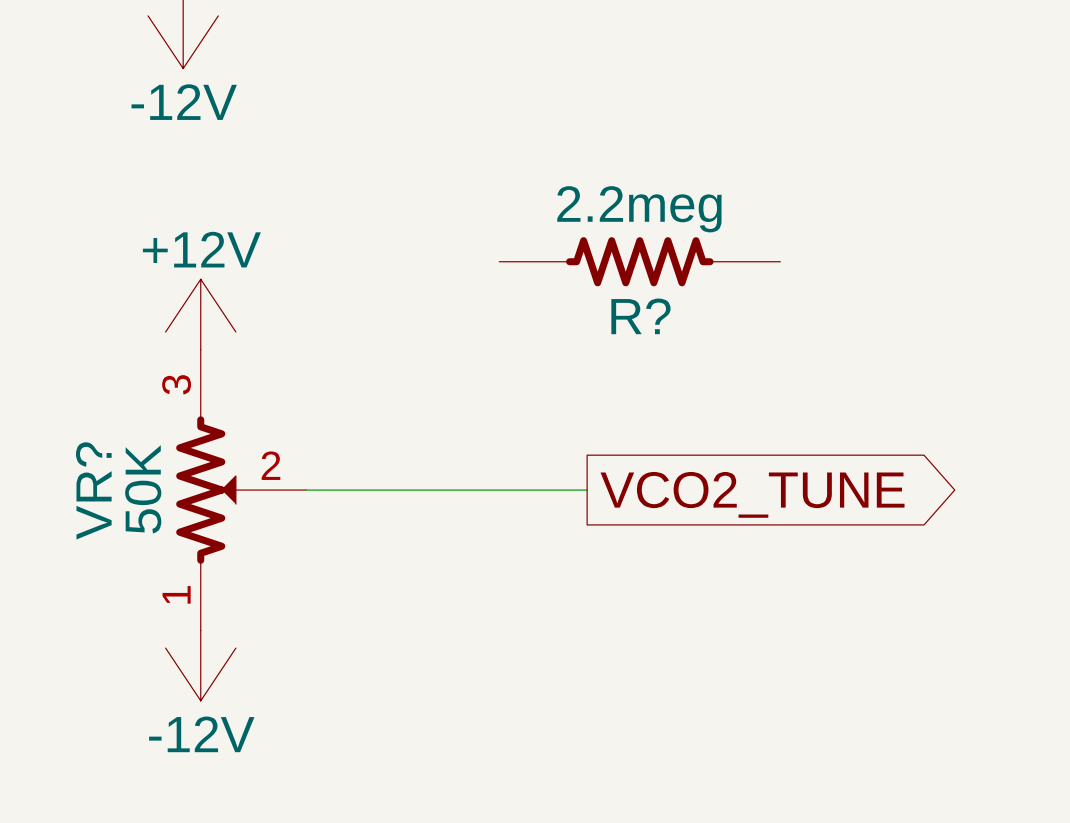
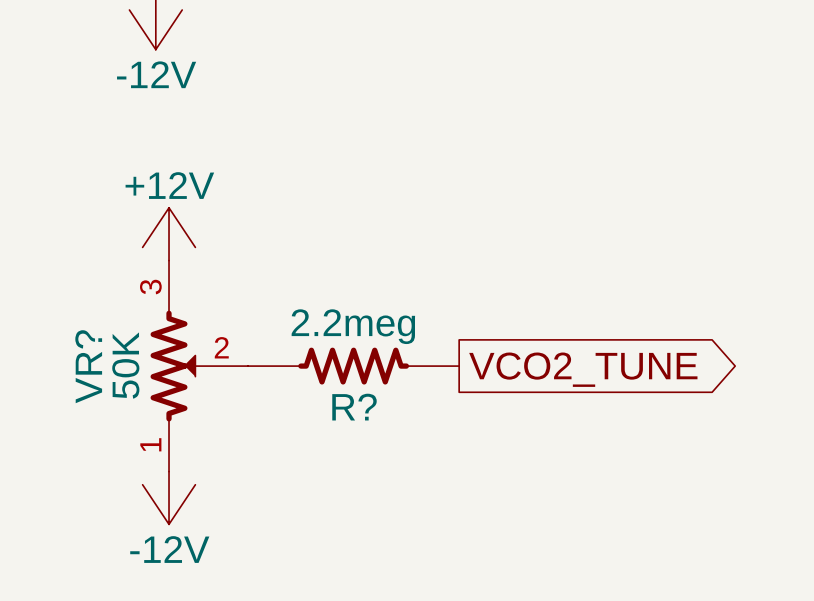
R? position: (639, 261) -> (353, 366)

